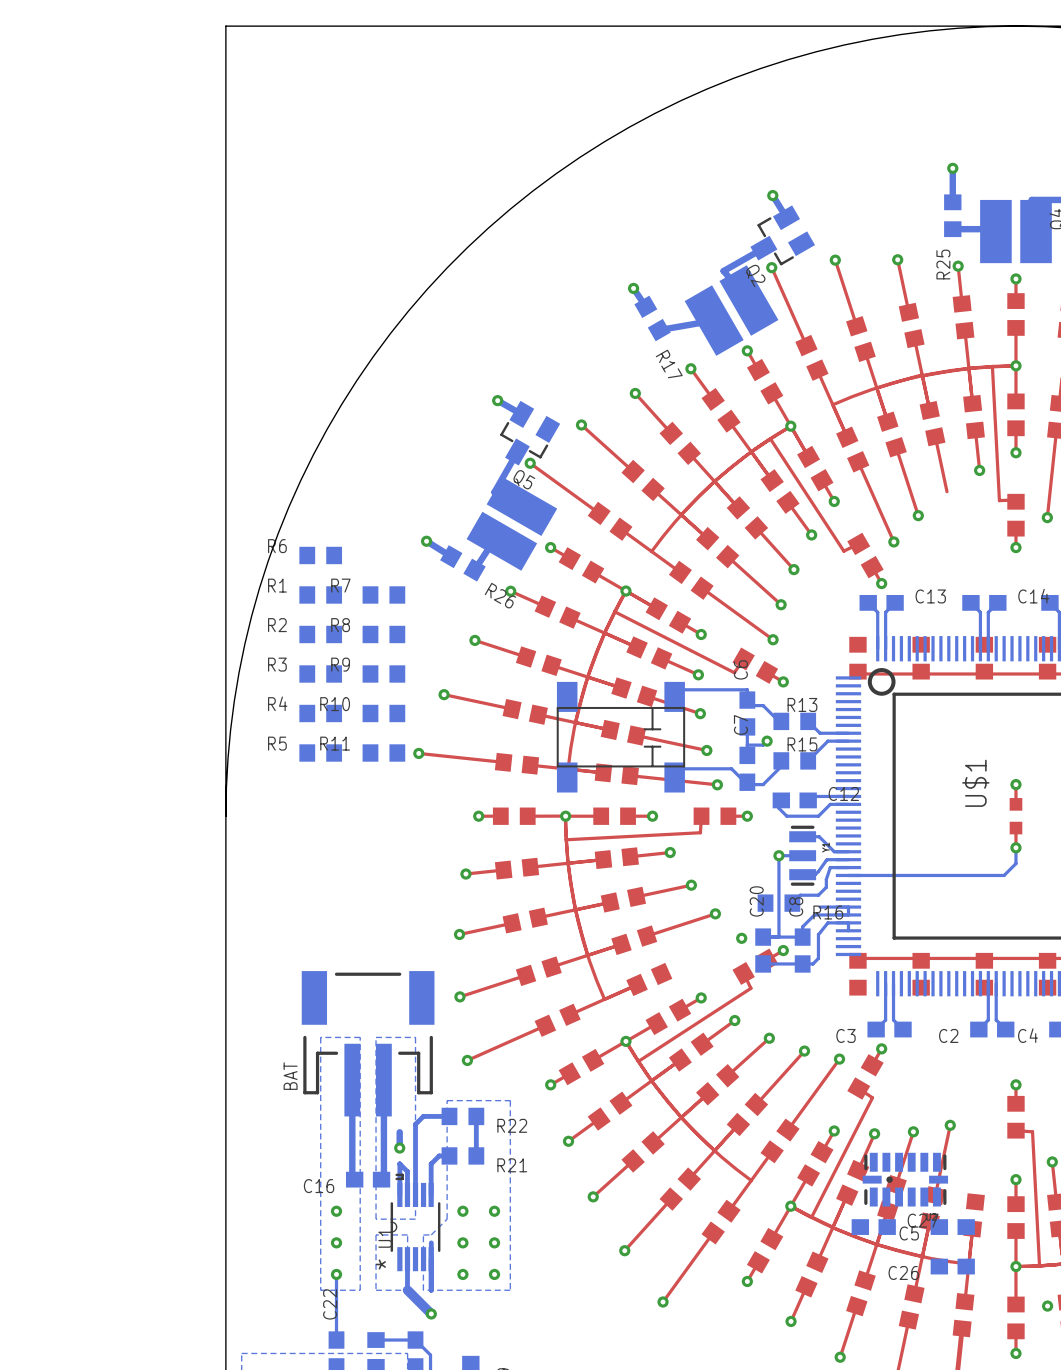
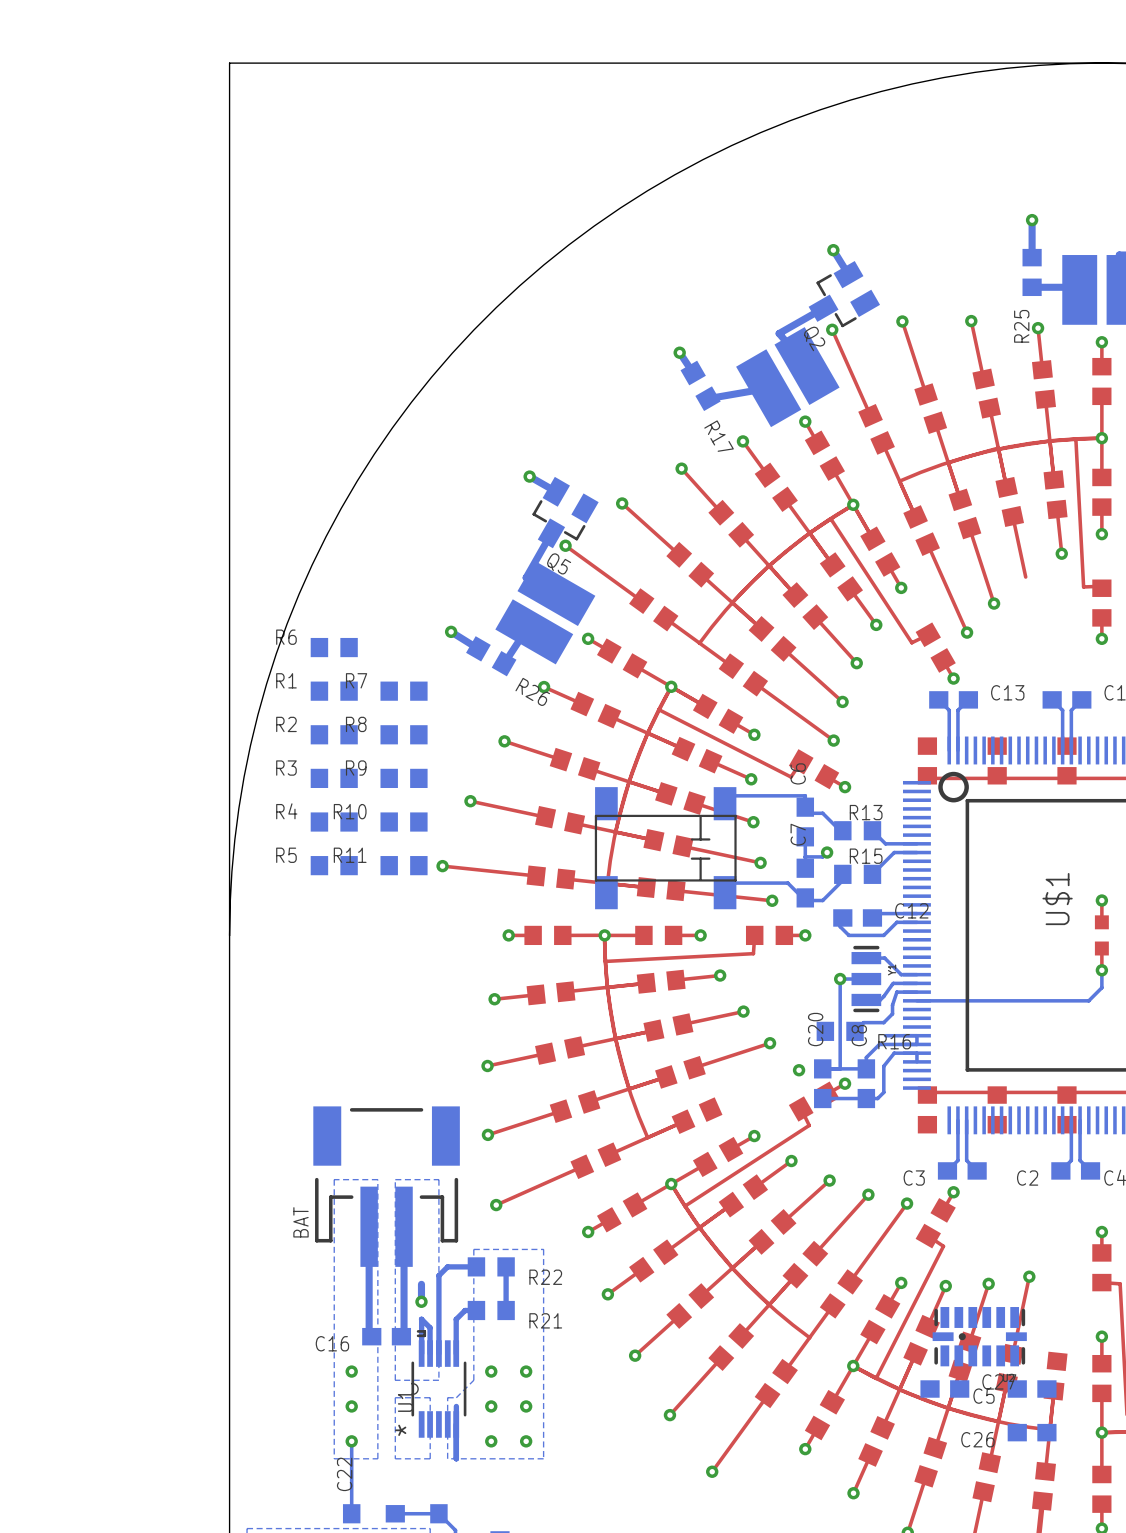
bottom track: (407, 1259) (407, 1290) -> none
bottom track: (407, 1290) (431, 1313) -> none
via: (431, 1313) -> none

